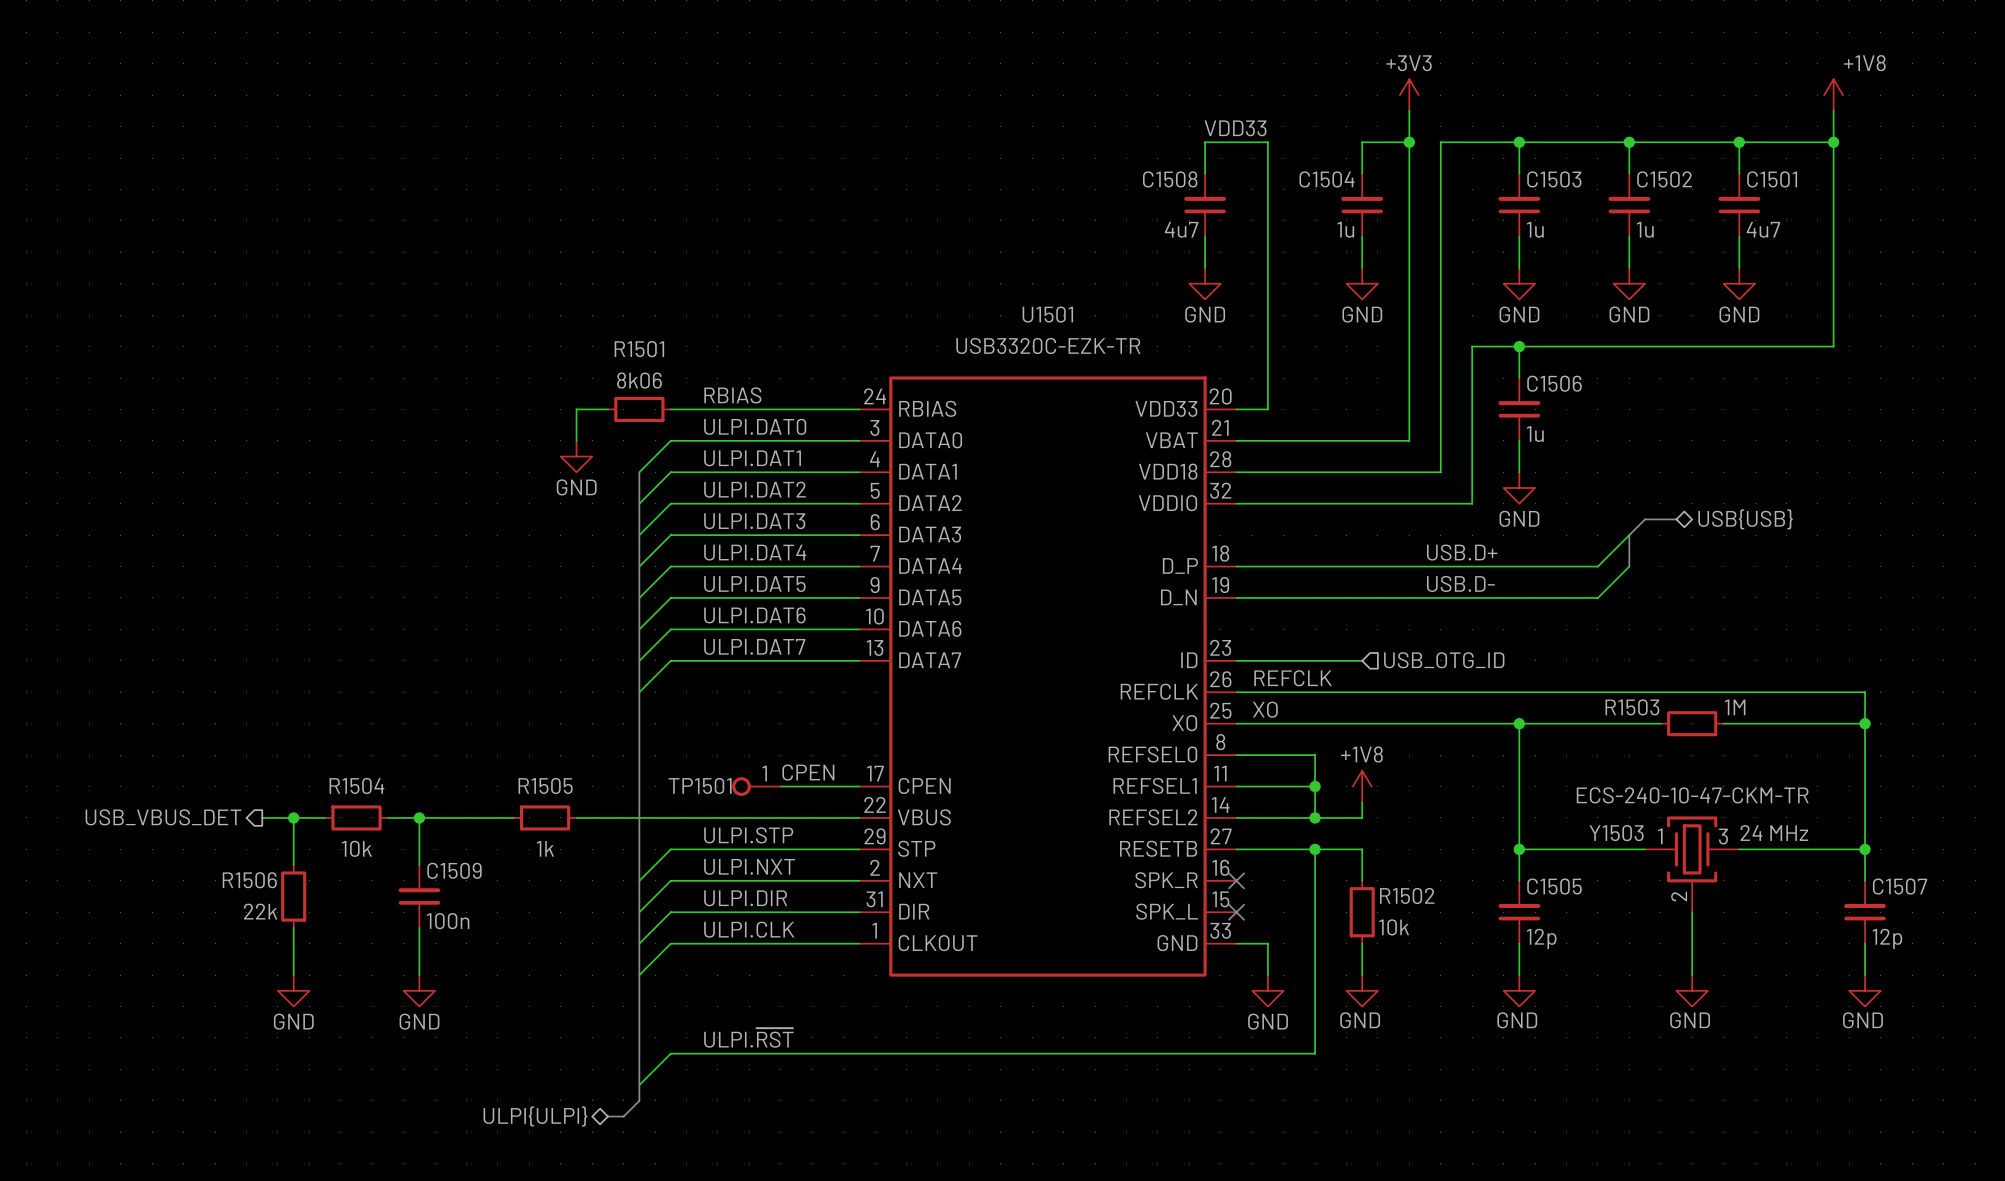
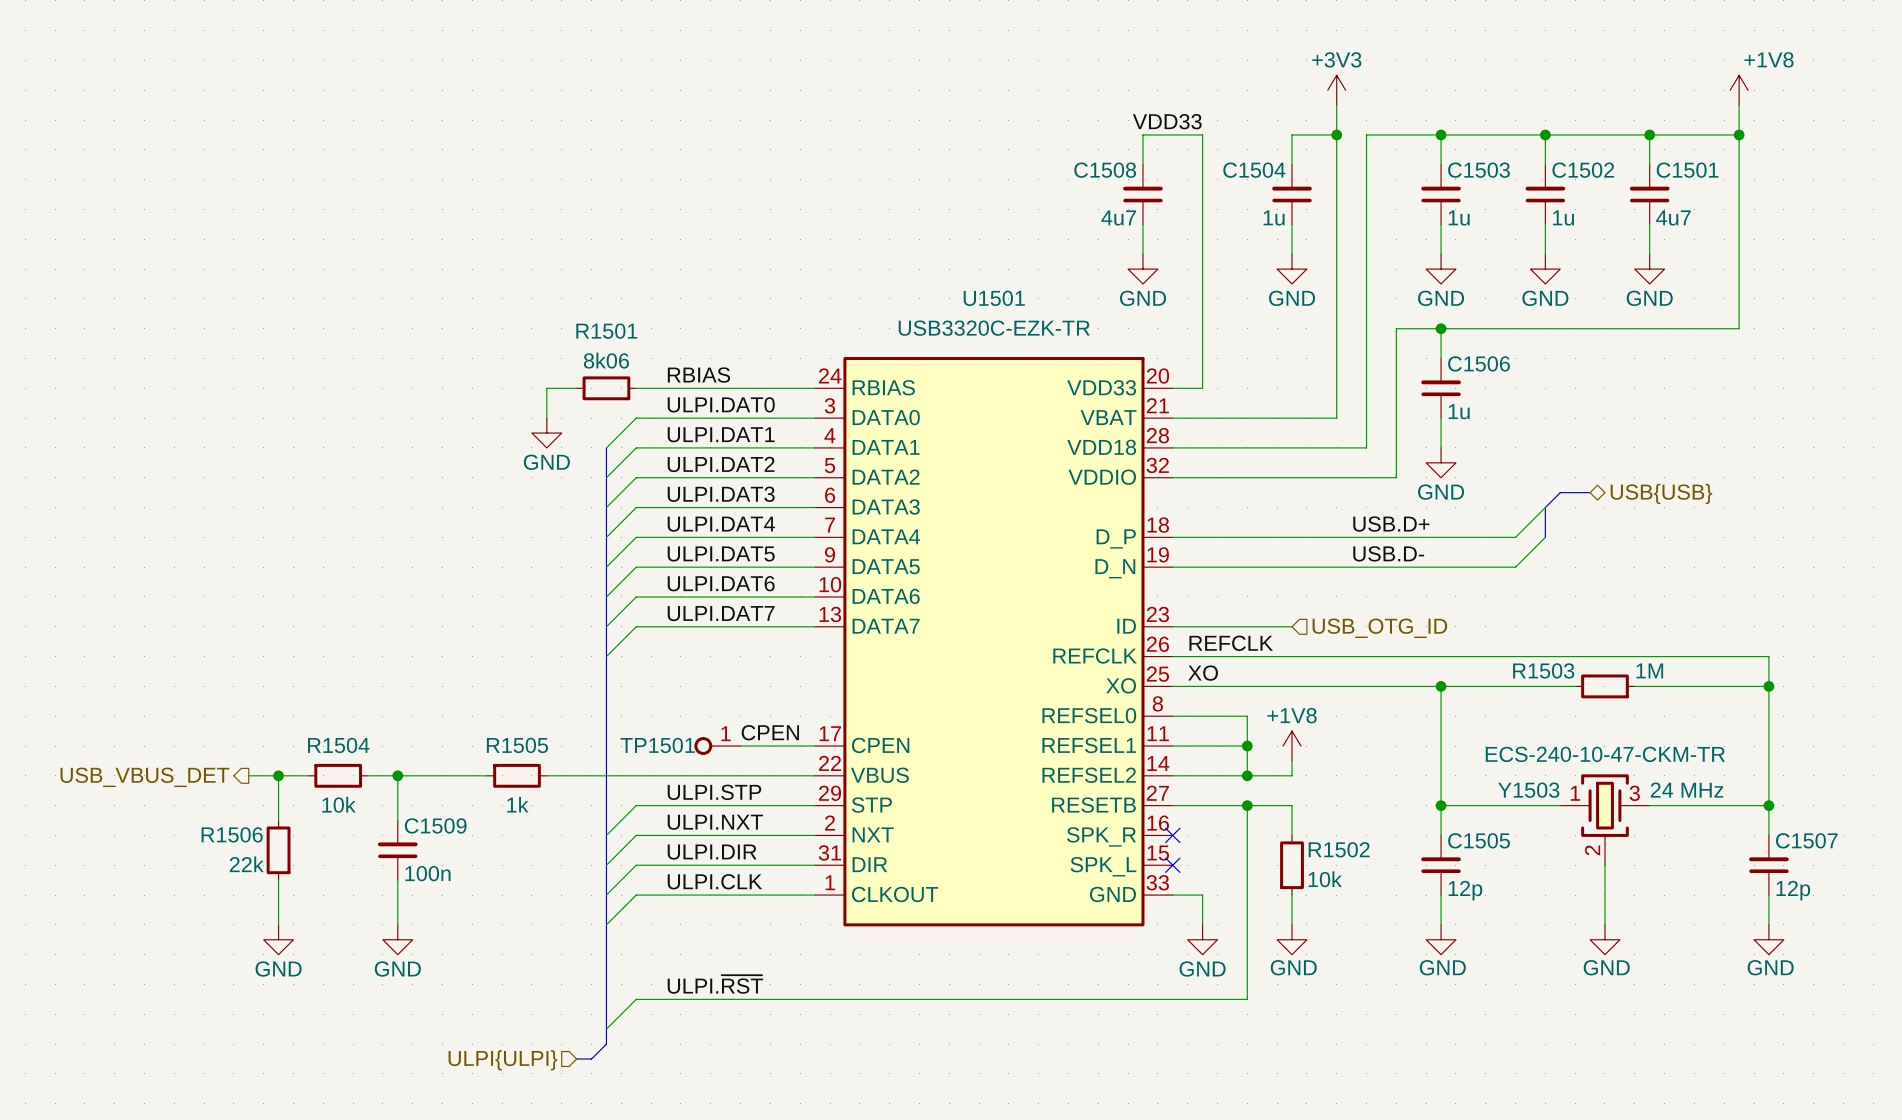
hierarchical label shape: bidirectional (535, 1116) -> input (502, 1060)

